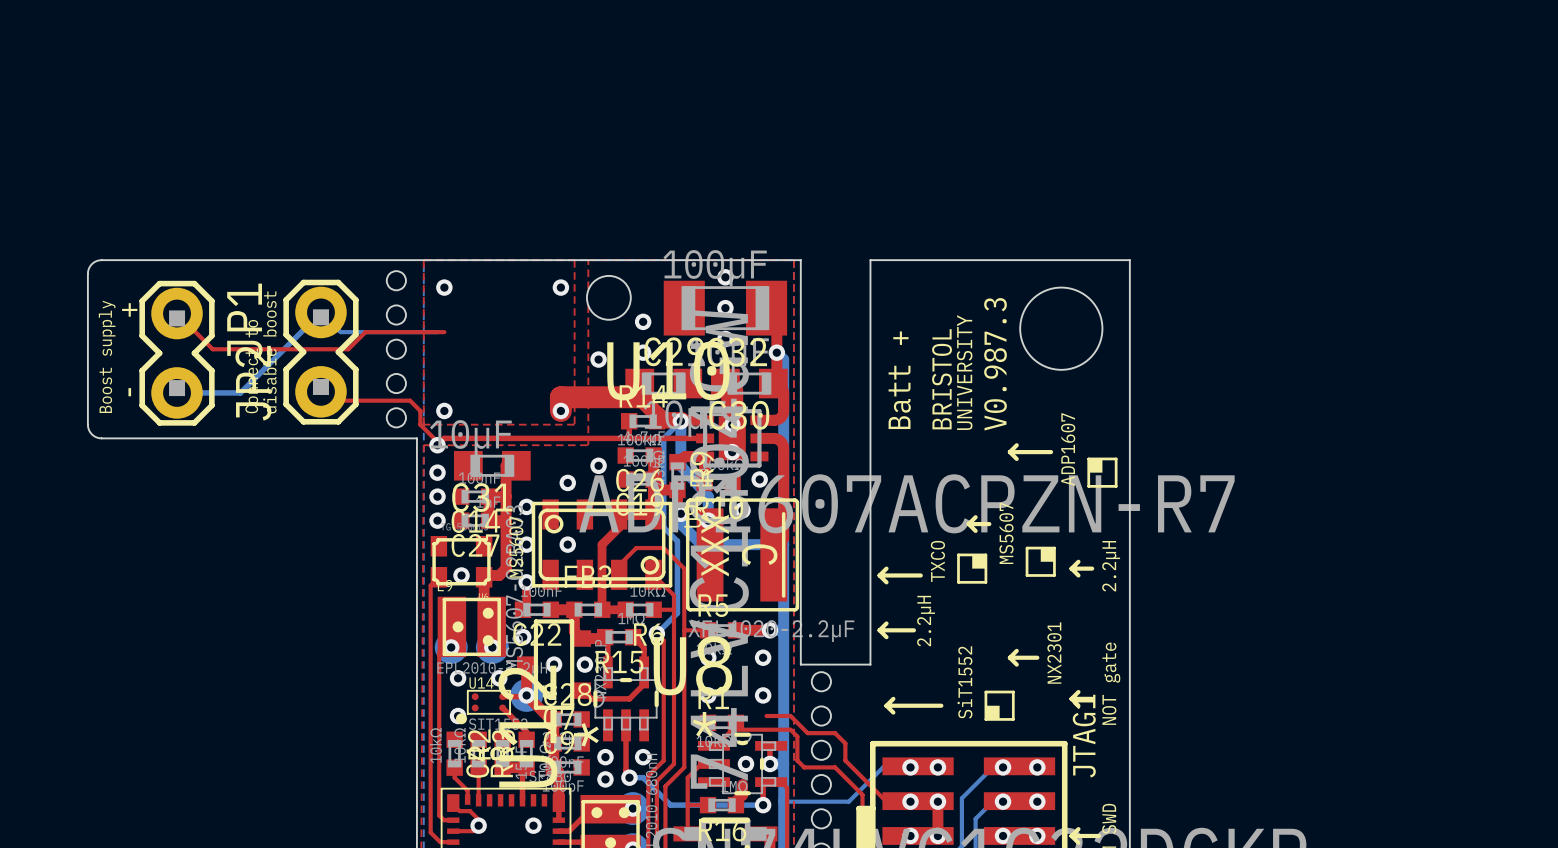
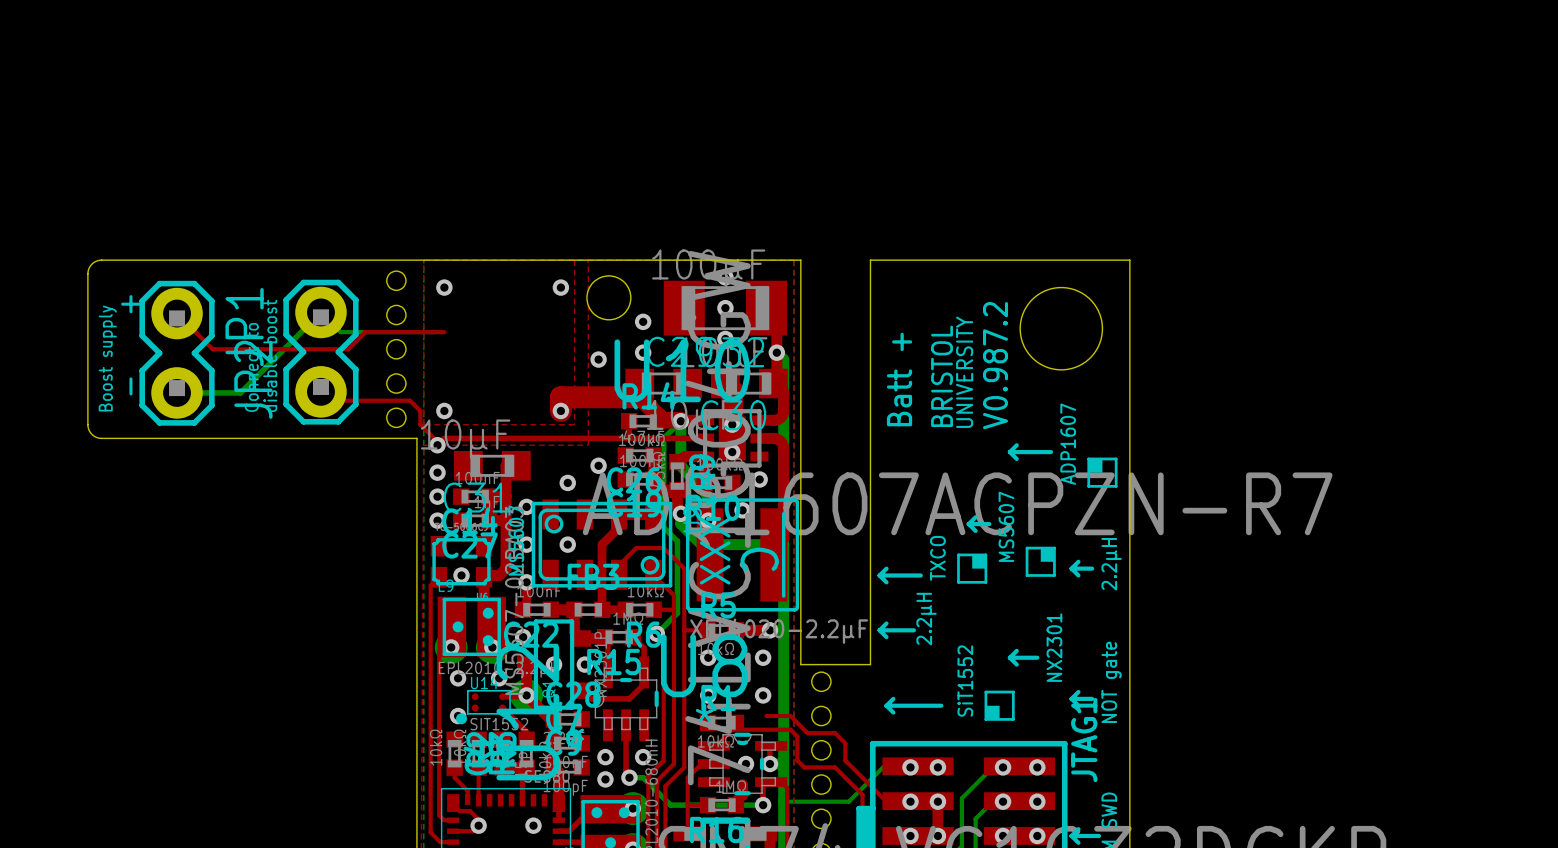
text: V0.987.3 (995, 364) -> V0.987.2 (995, 365)

